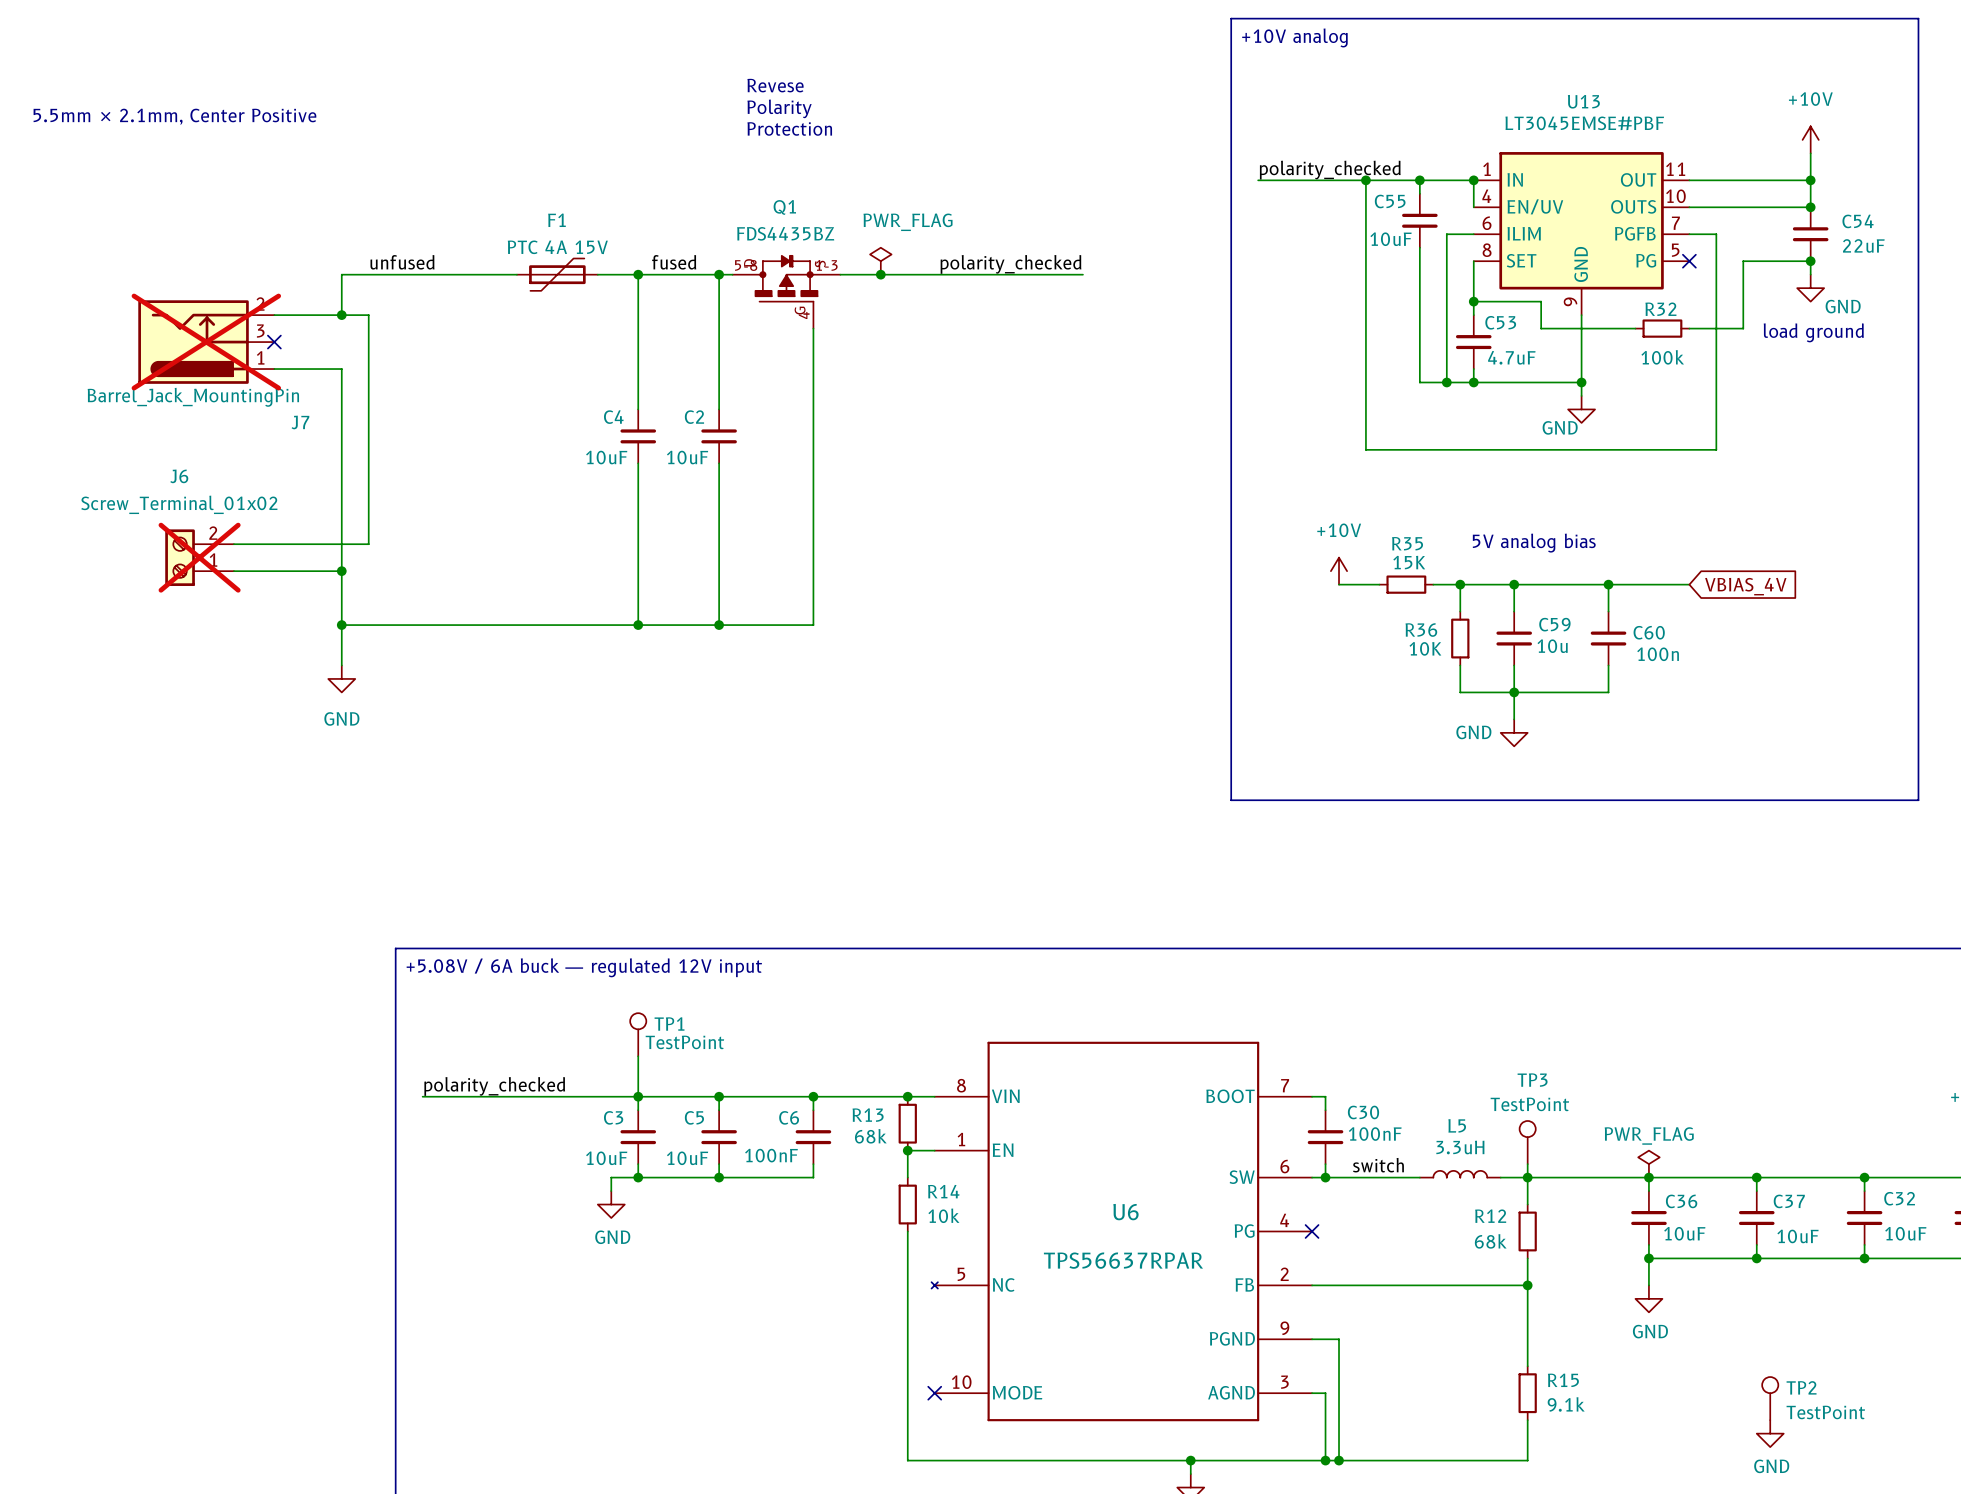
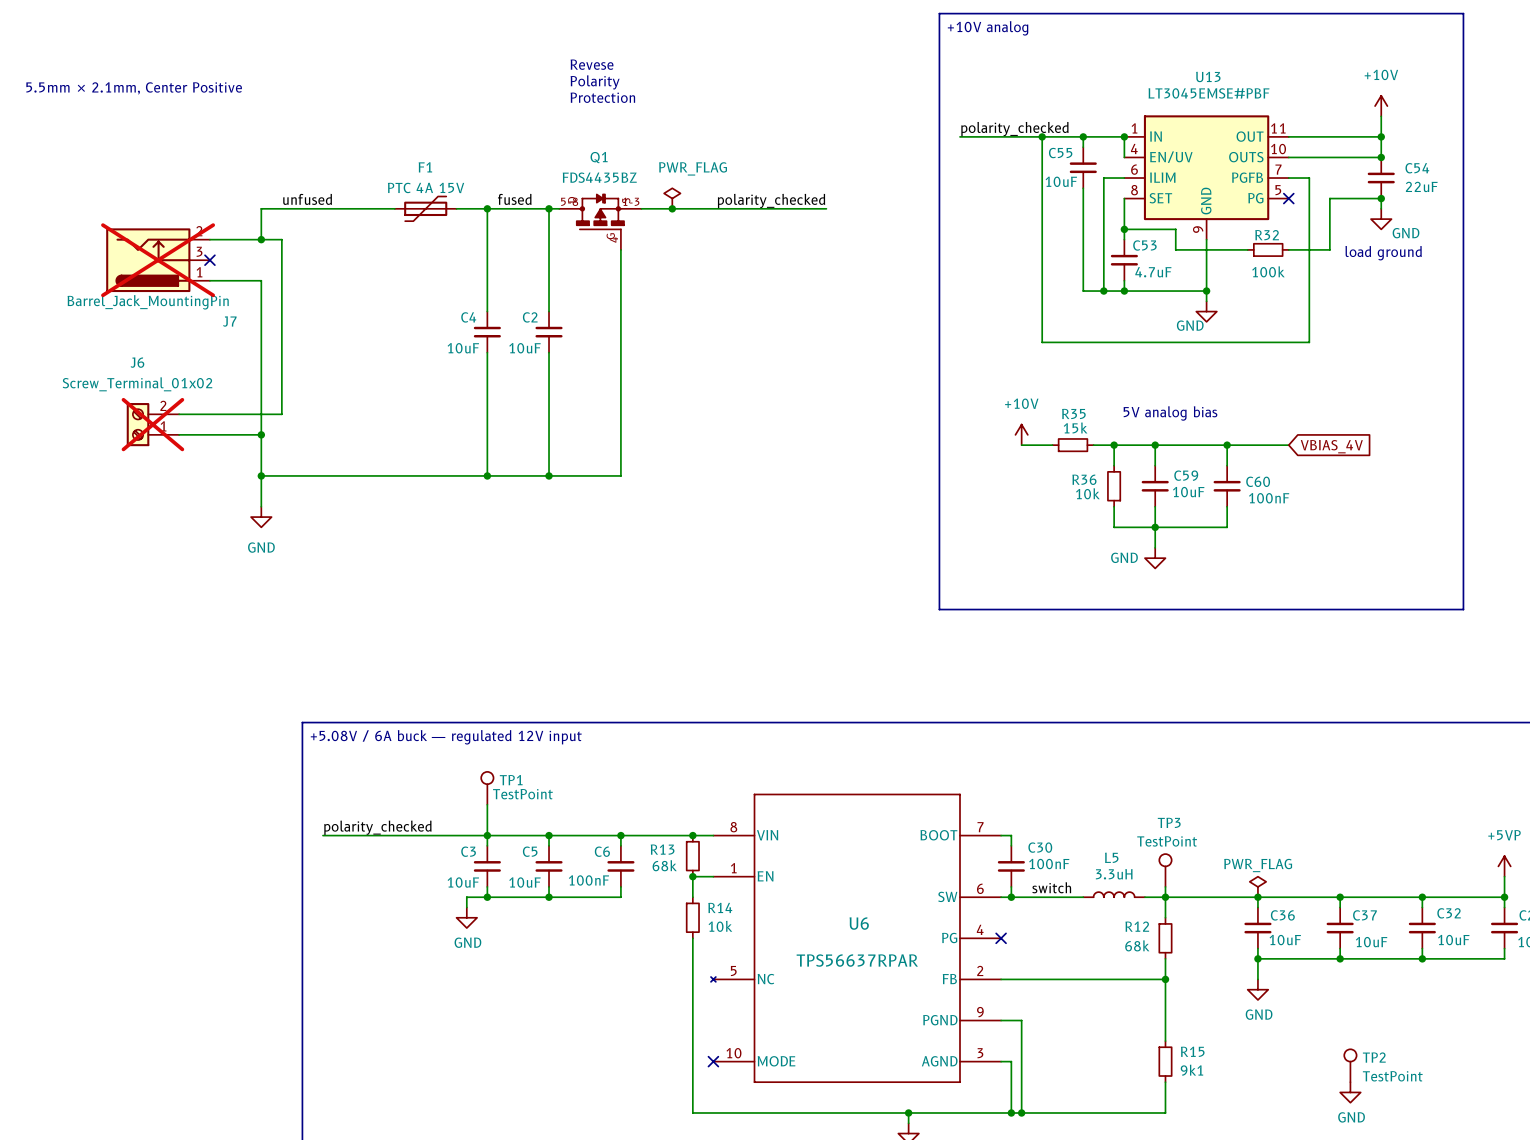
R35 value: 15K (1409, 562) -> 15k (1075, 427)
C59 value: 10u (1552, 646) -> 10uF (1188, 492)
R36 value: 10K (1425, 648) -> 10k (1087, 493)
C60 value: 100n (1658, 654) -> 100nF (1269, 498)
R15 value: 9.1k (1566, 1404) -> 9k1 (1191, 1070)

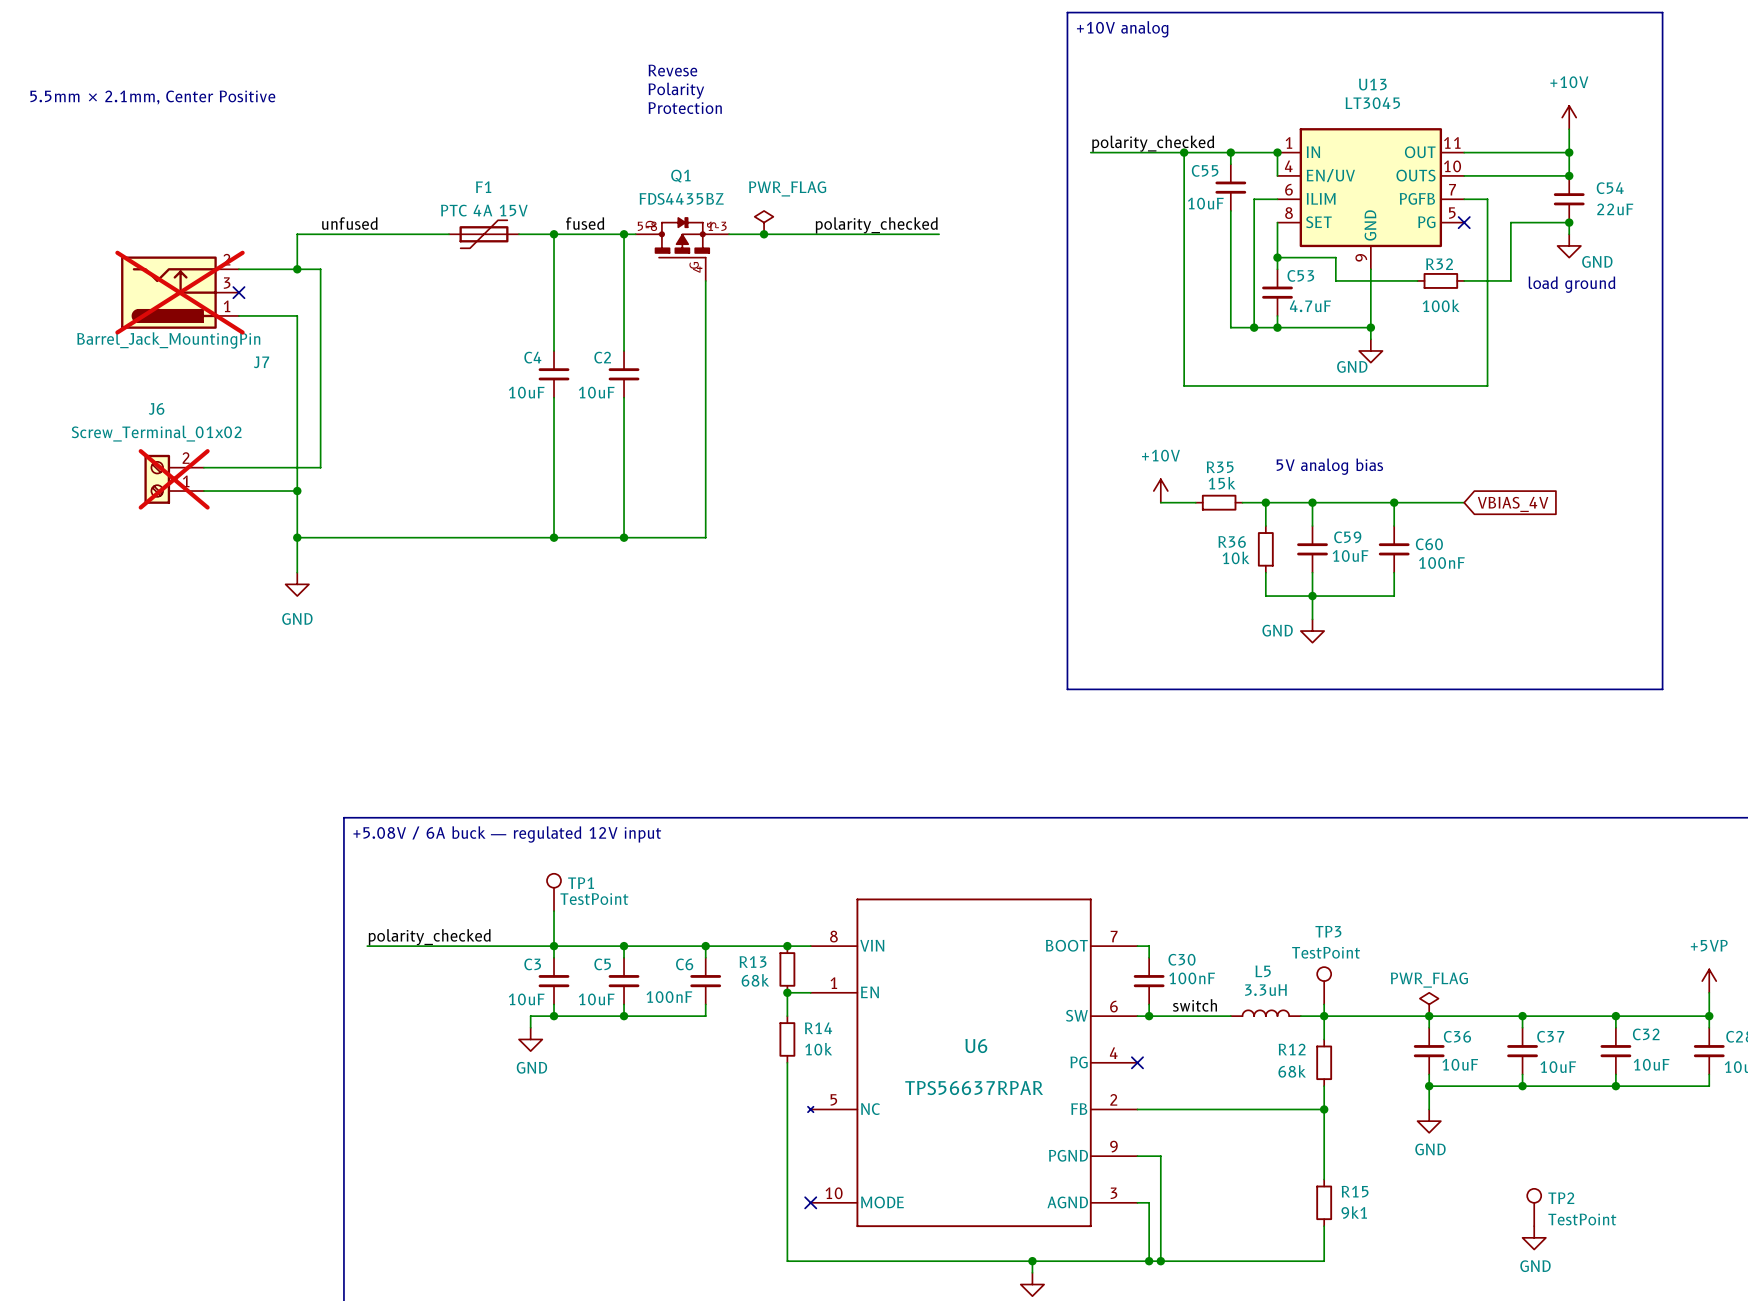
U13 value: LT3045EMSE#PBF (1208, 93) -> LT3045 (1372, 103)

